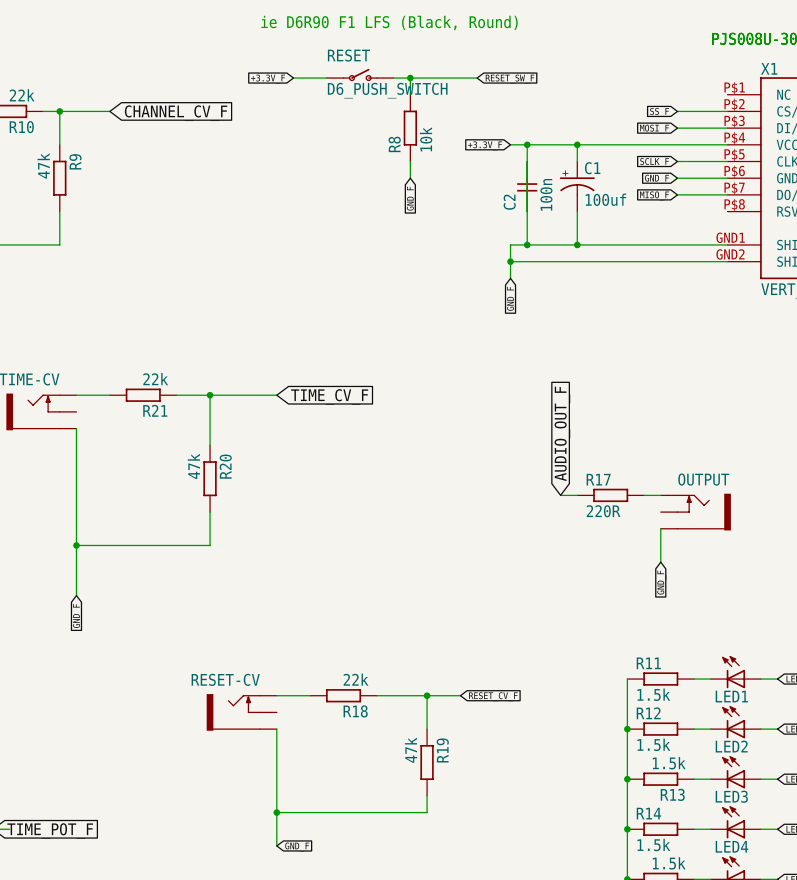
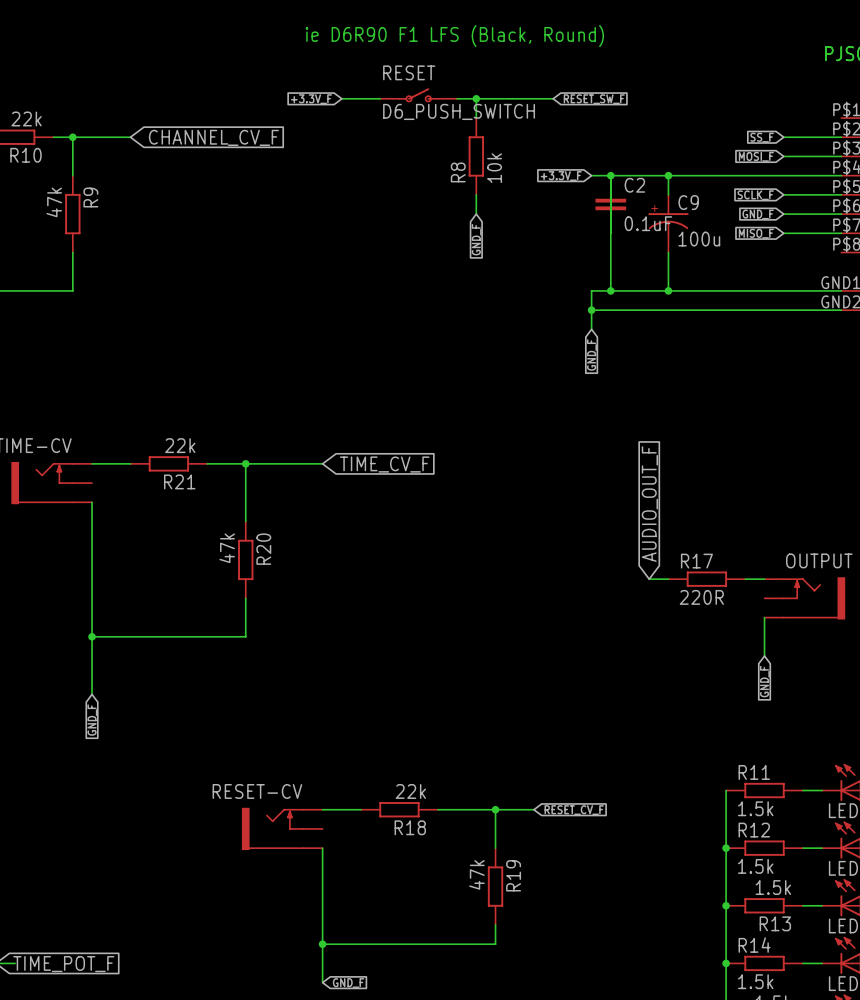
C2 symbol: [517, 161, 538, 212] -> [595, 175, 627, 234]
C1 name: C1 (592, 168) -> C9 (688, 202)
C2 value: 100n (546, 194) -> 0.1uF (648, 223)
C1 value: 100uf (605, 199) -> 100u (699, 239)
C2 name position: C2 (509, 202) -> C2 (634, 185)

